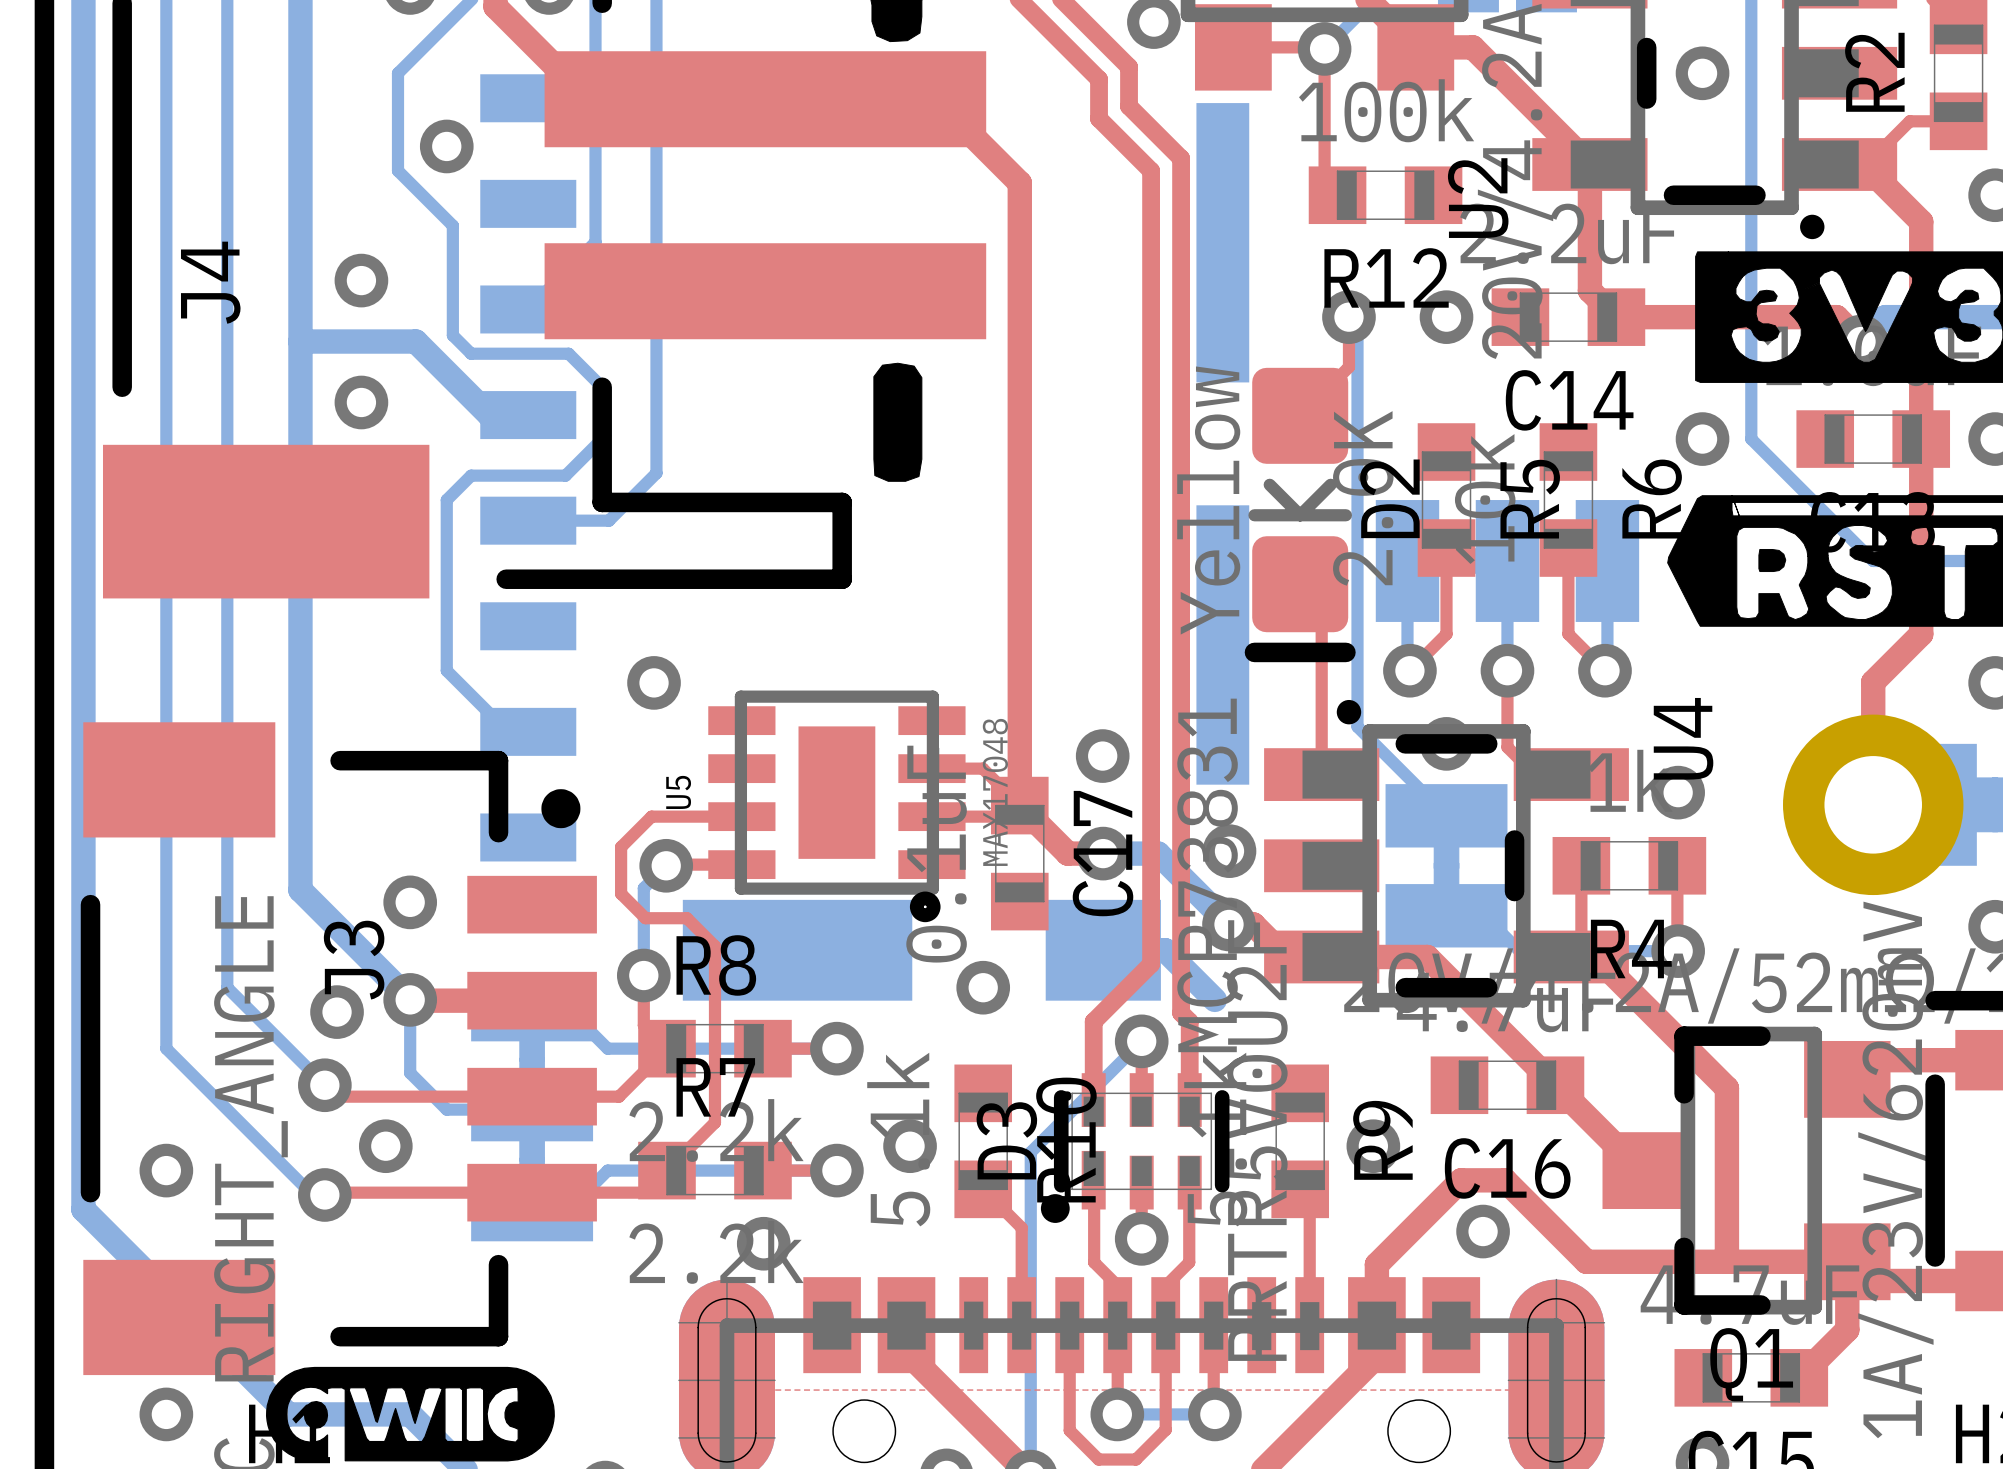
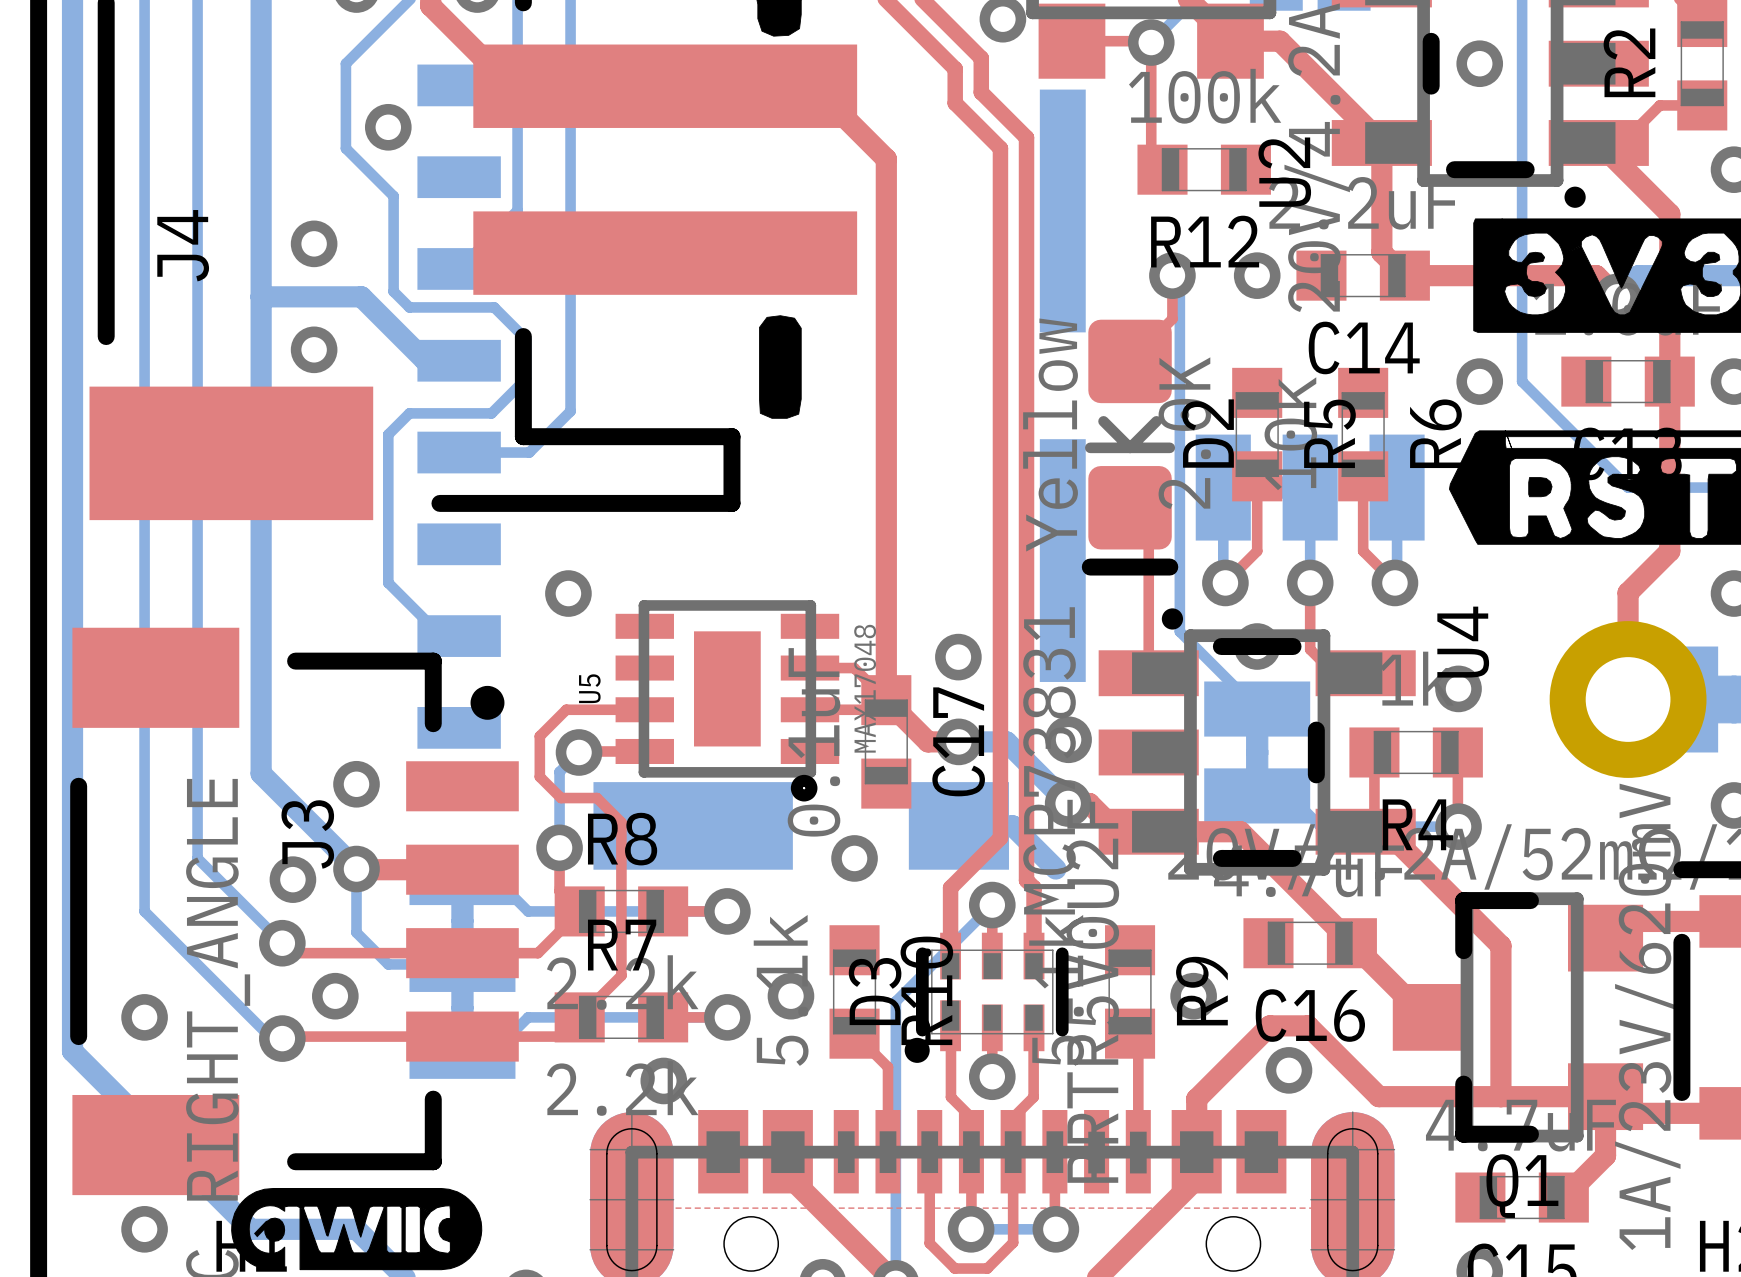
top track: (1839, 164) (1863, 164) (1921, 221) (1921, 246) -> (1598, 142) (1669, 213)

